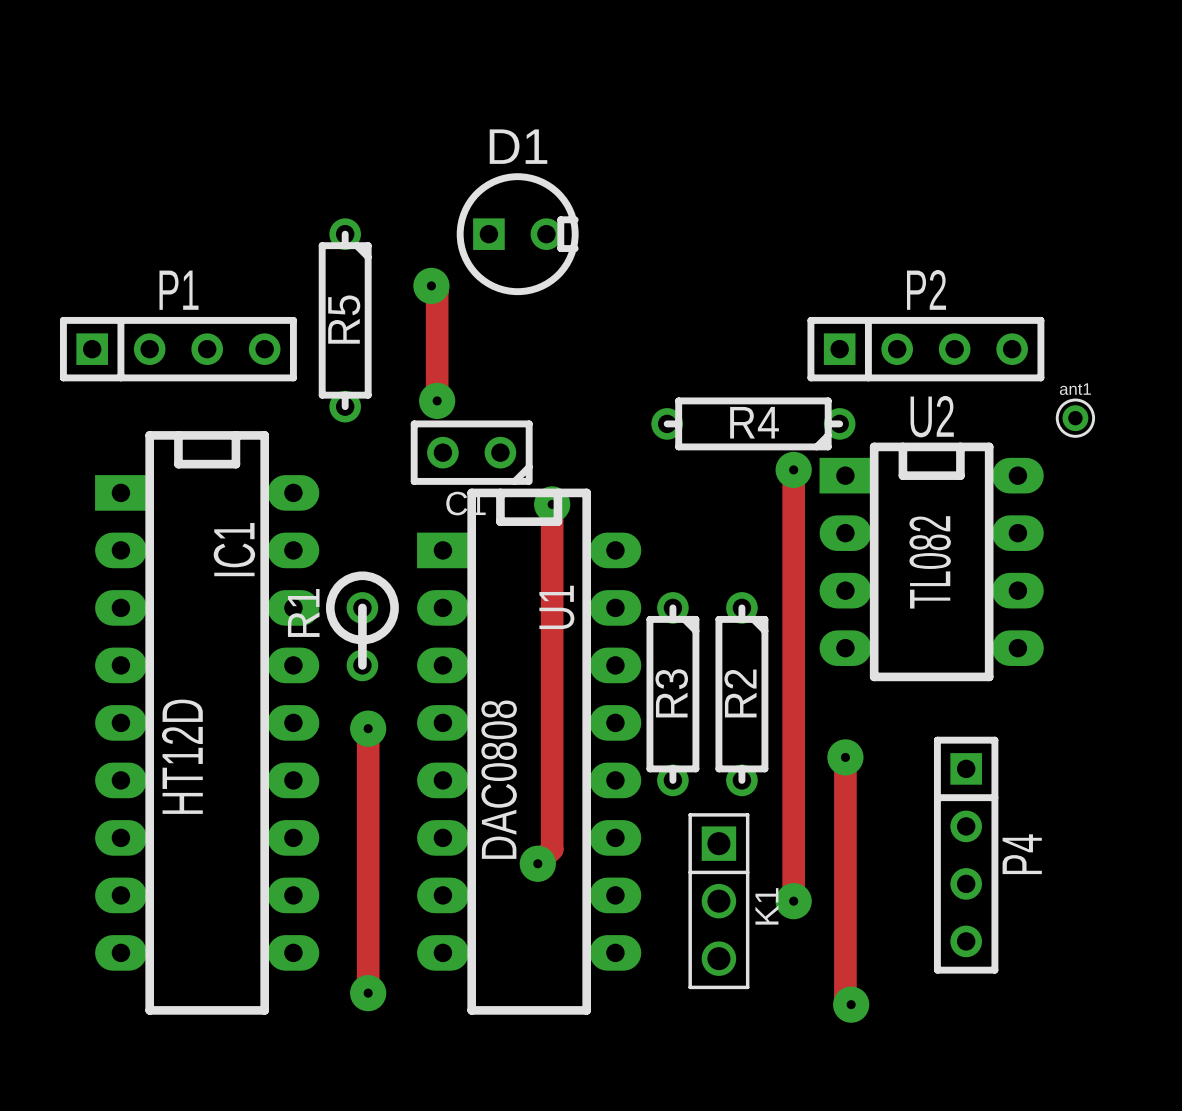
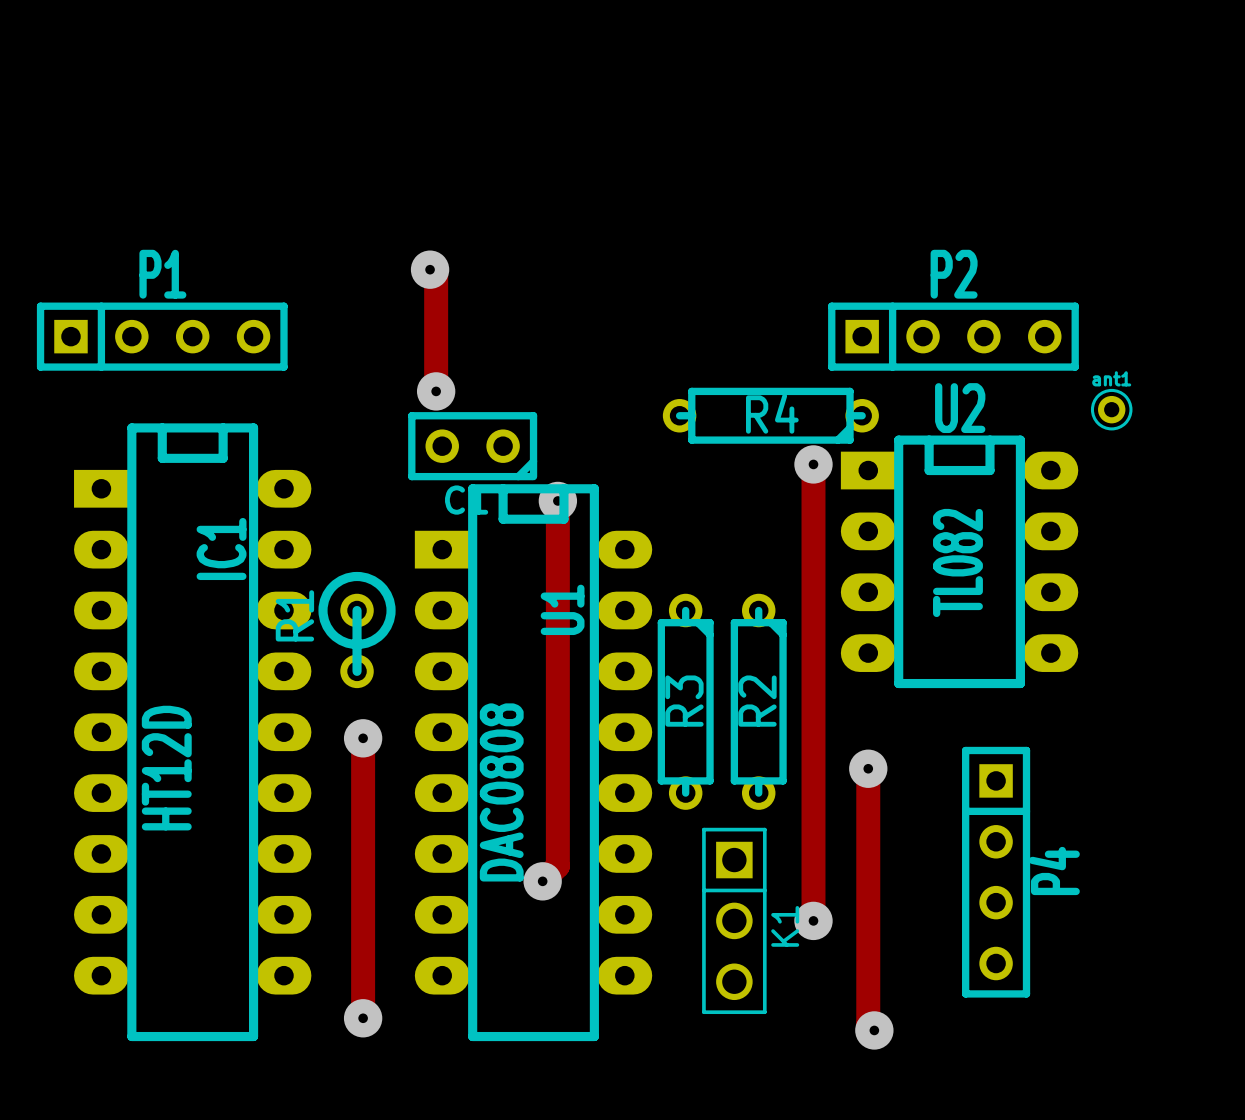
D1: (517, 234) -> none
R5: (345, 320) -> none

